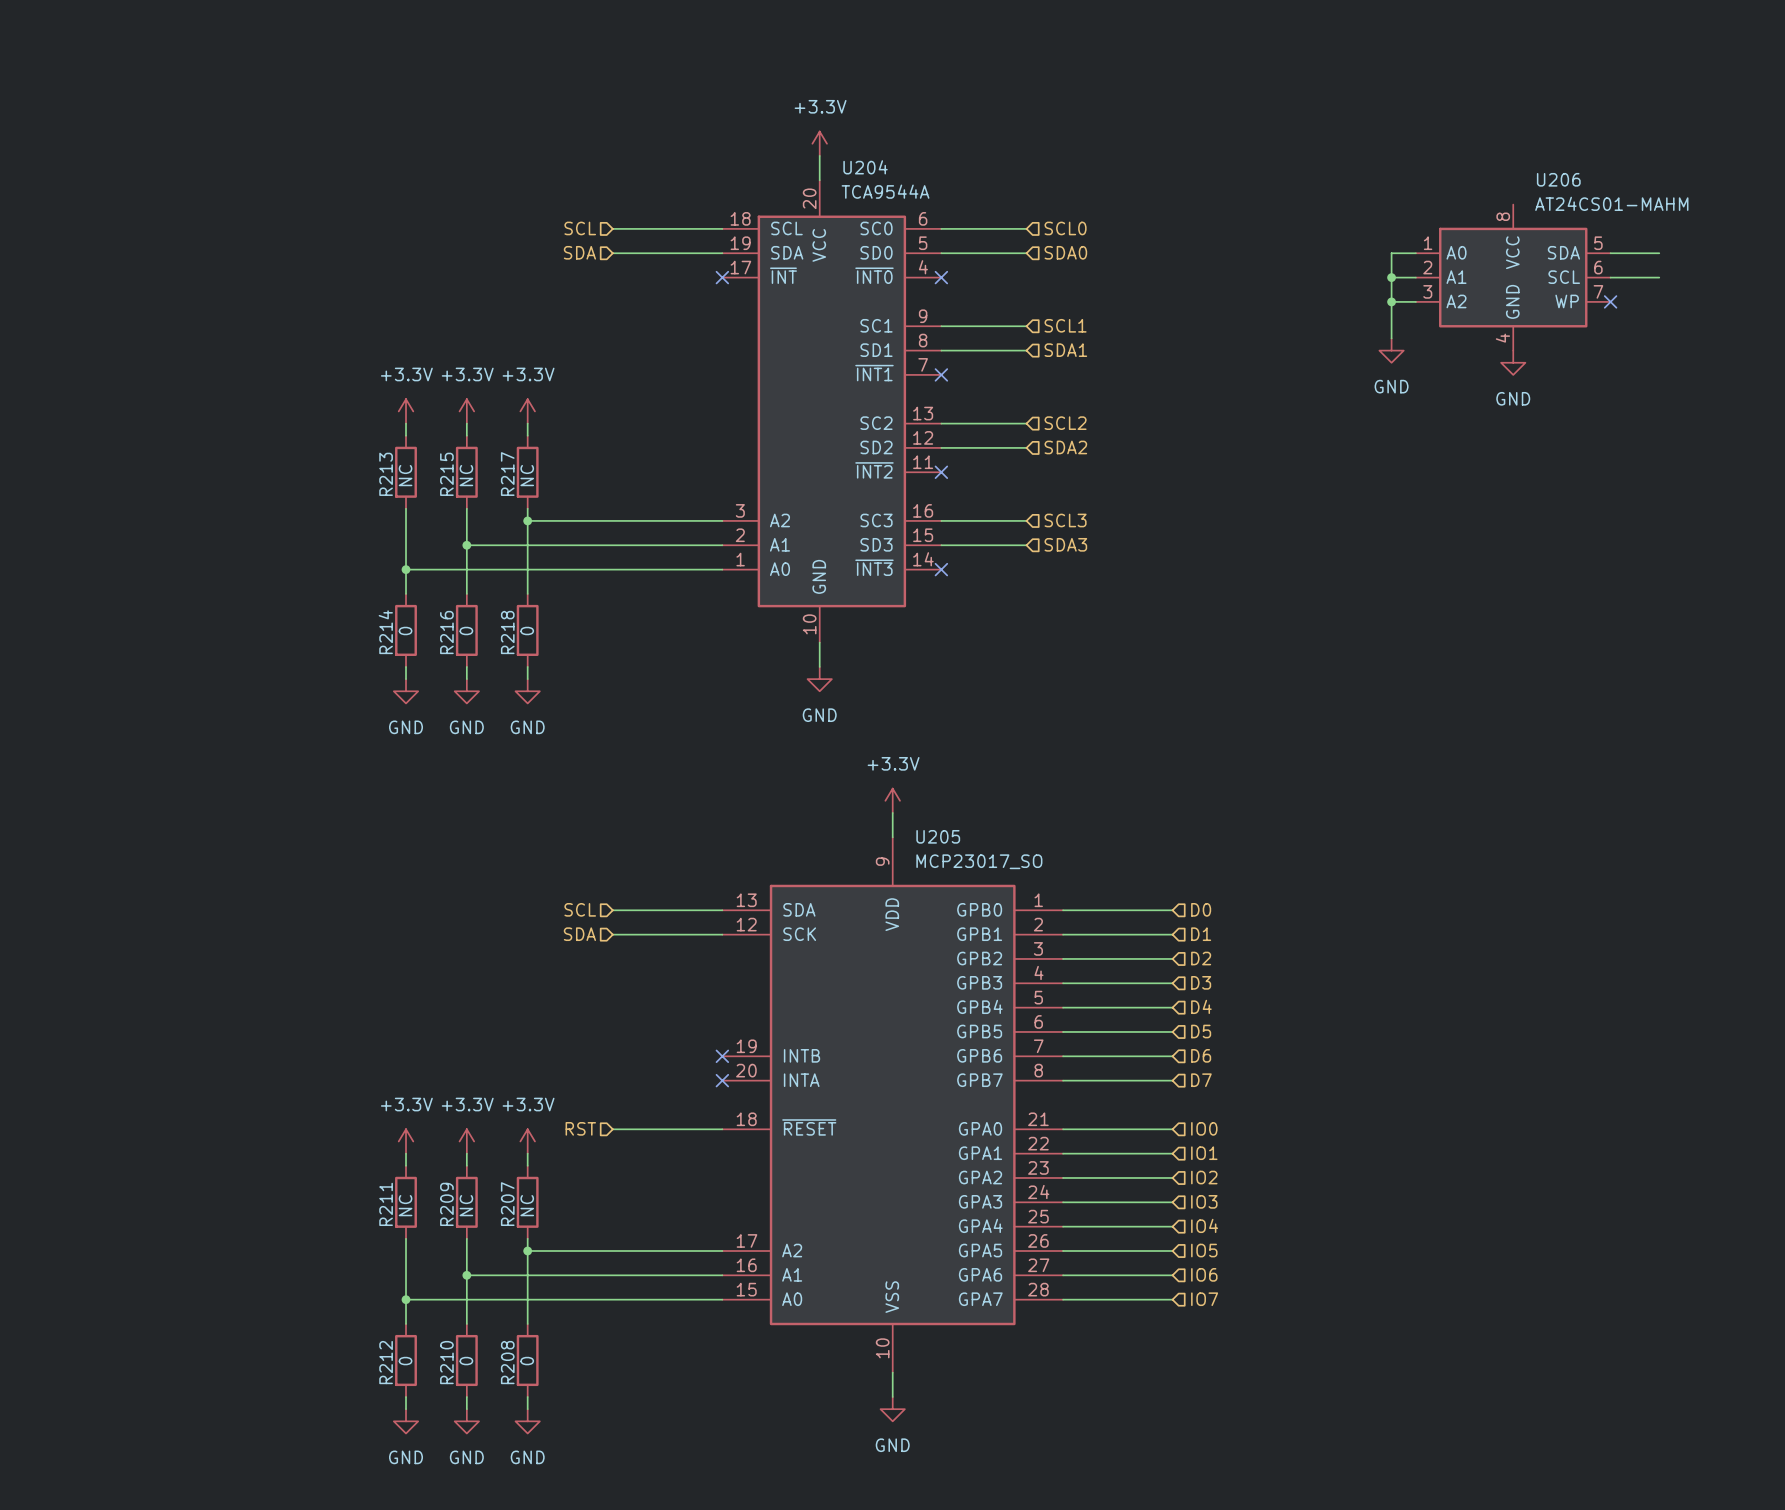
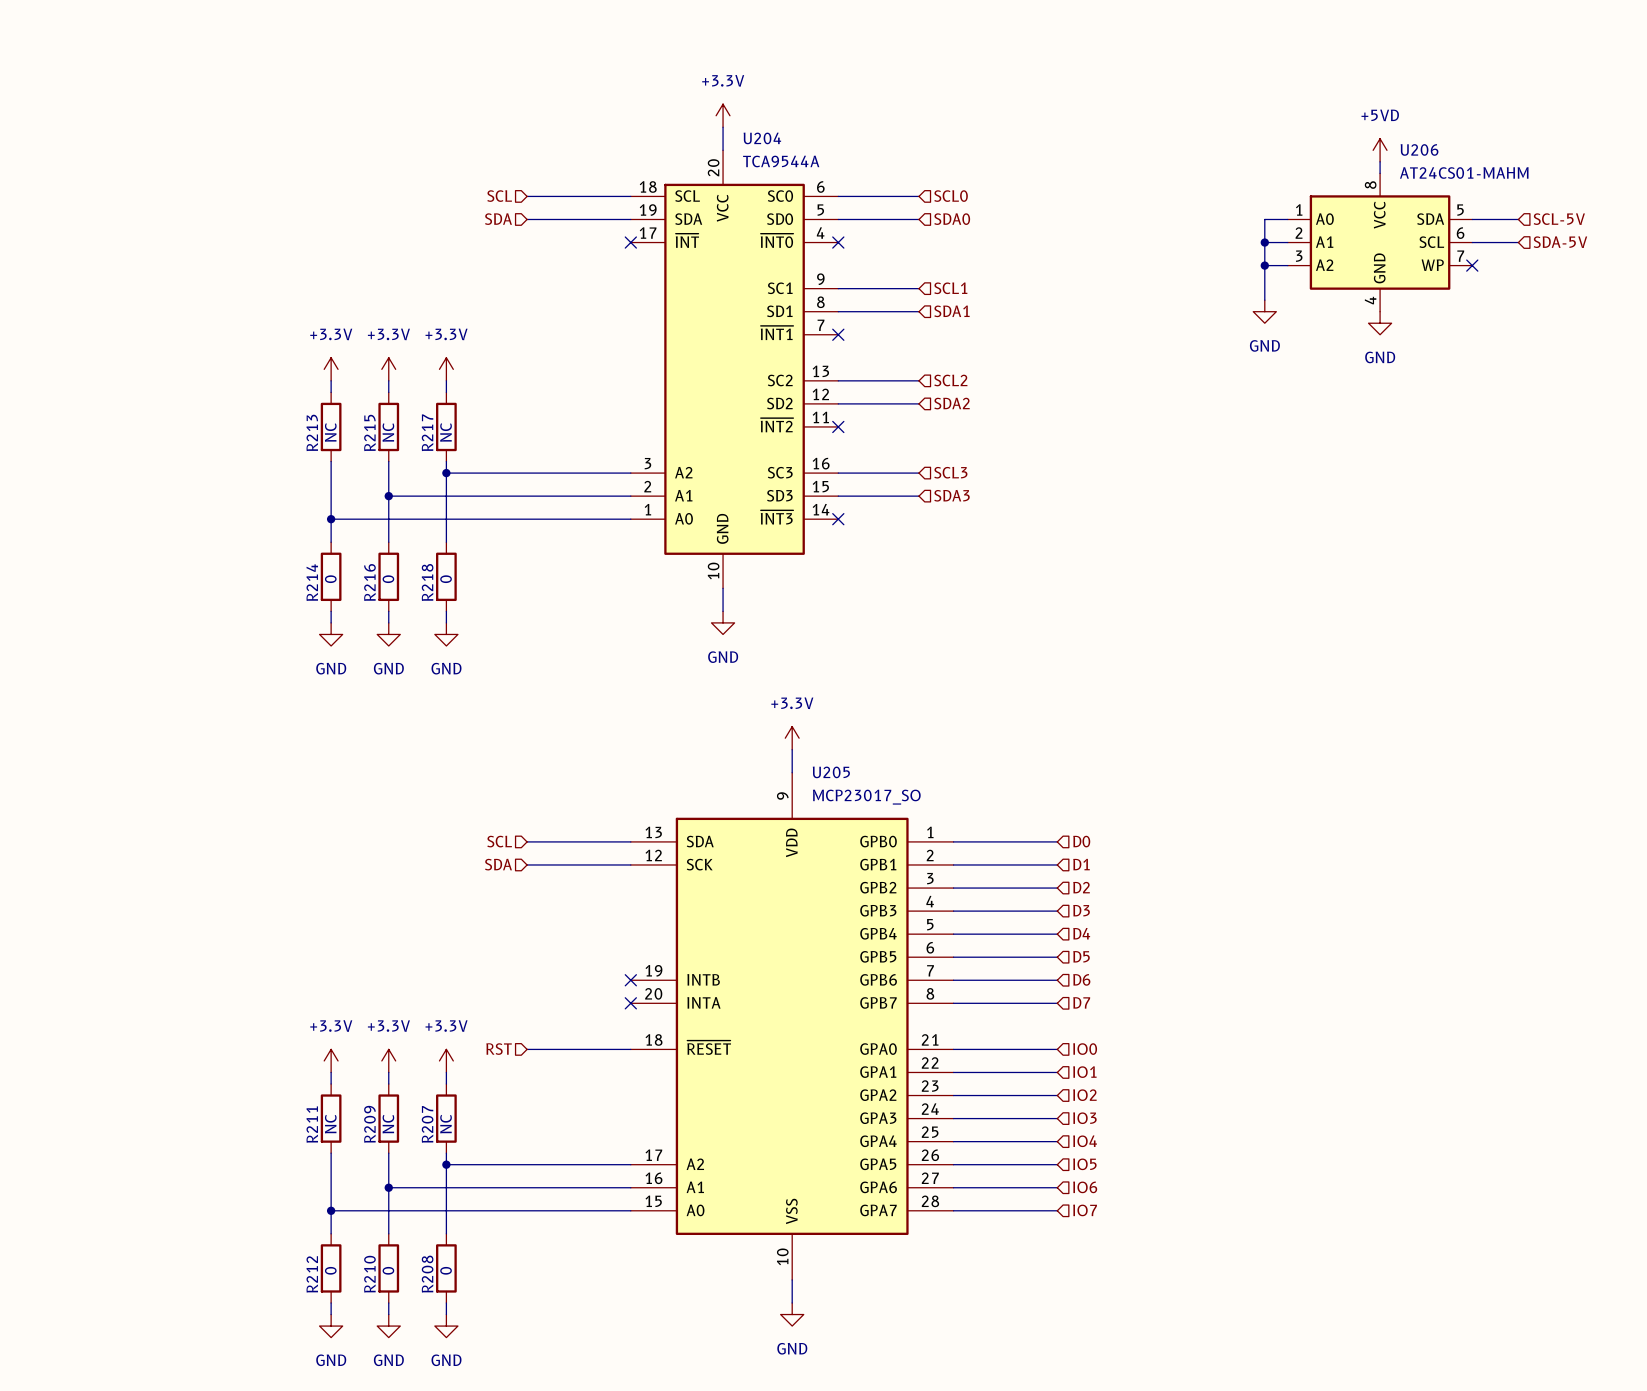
power symbol: none -> +5VD (1380, 150)
wire: none -> (1380, 161) (1380, 173)
hierarchical label: none -> SCL-5V (1559, 219)
hierarchical label: none -> SDA-5V (1560, 242)

